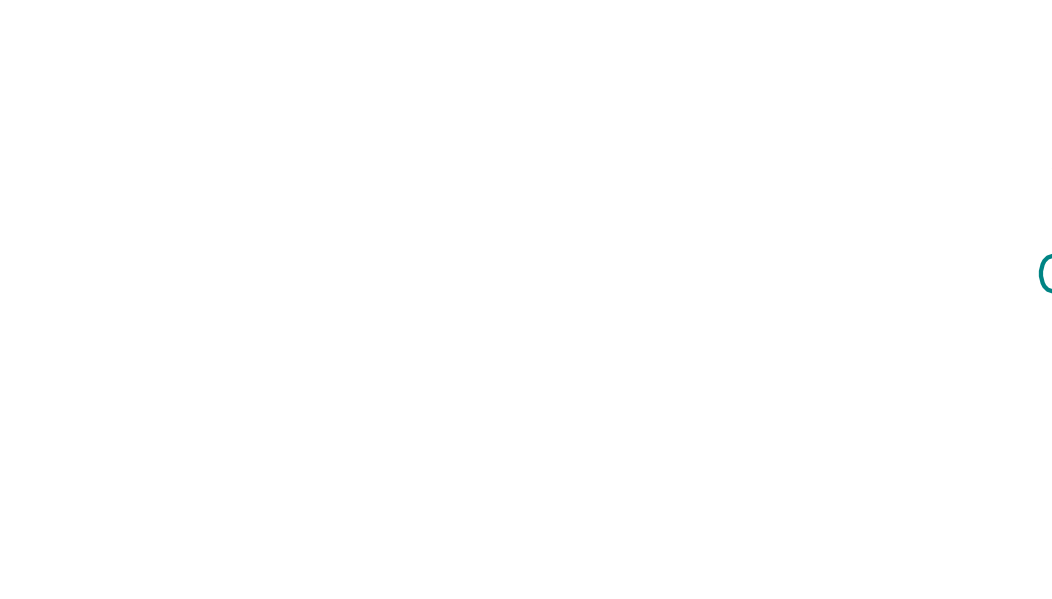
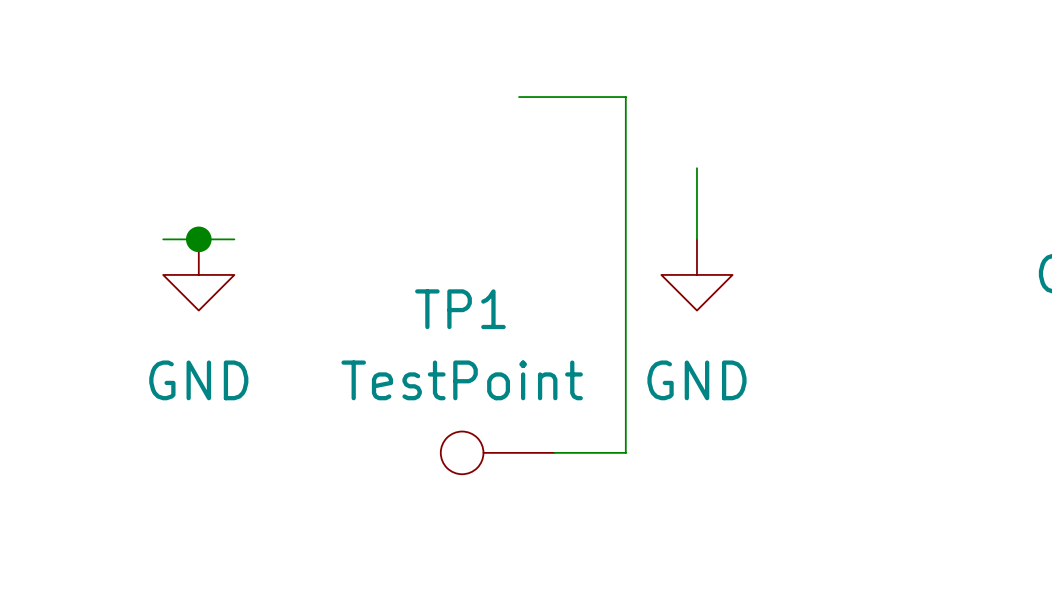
wire: none -> (519, 97) (625, 97) (625, 452) (554, 452)
wire: none -> (696, 168) (696, 239)
wire: none -> (163, 239) (234, 239)
junction: none -> (198, 239)
power symbol: none -> GND (198, 274)
power symbol: none -> GND (696, 274)
TP1: none -> TestPoint (497, 452)

